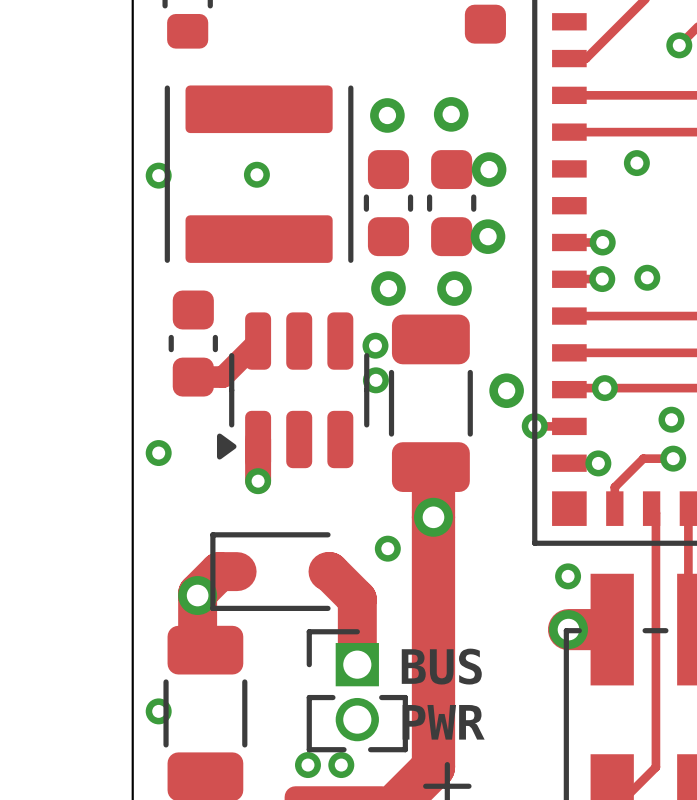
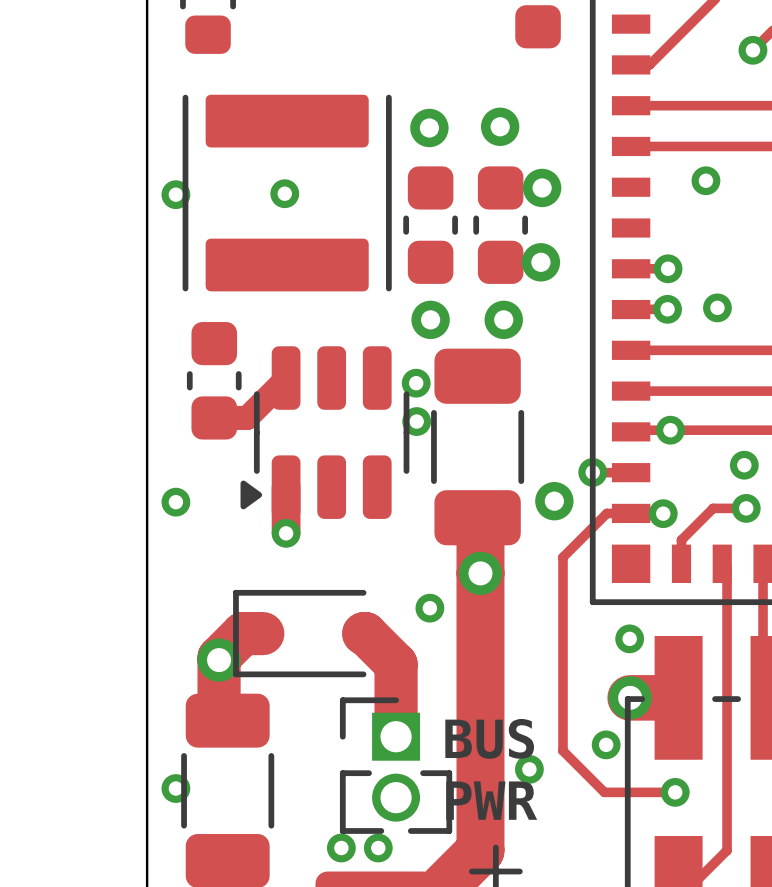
via position: (506, 390) -> (554, 501)
track: none -> (631, 513) (606, 513) (562, 557) (562, 750) (604, 792) (675, 792)
via: none -> (606, 744)
via: none -> (529, 769)
via: none -> (675, 792)

